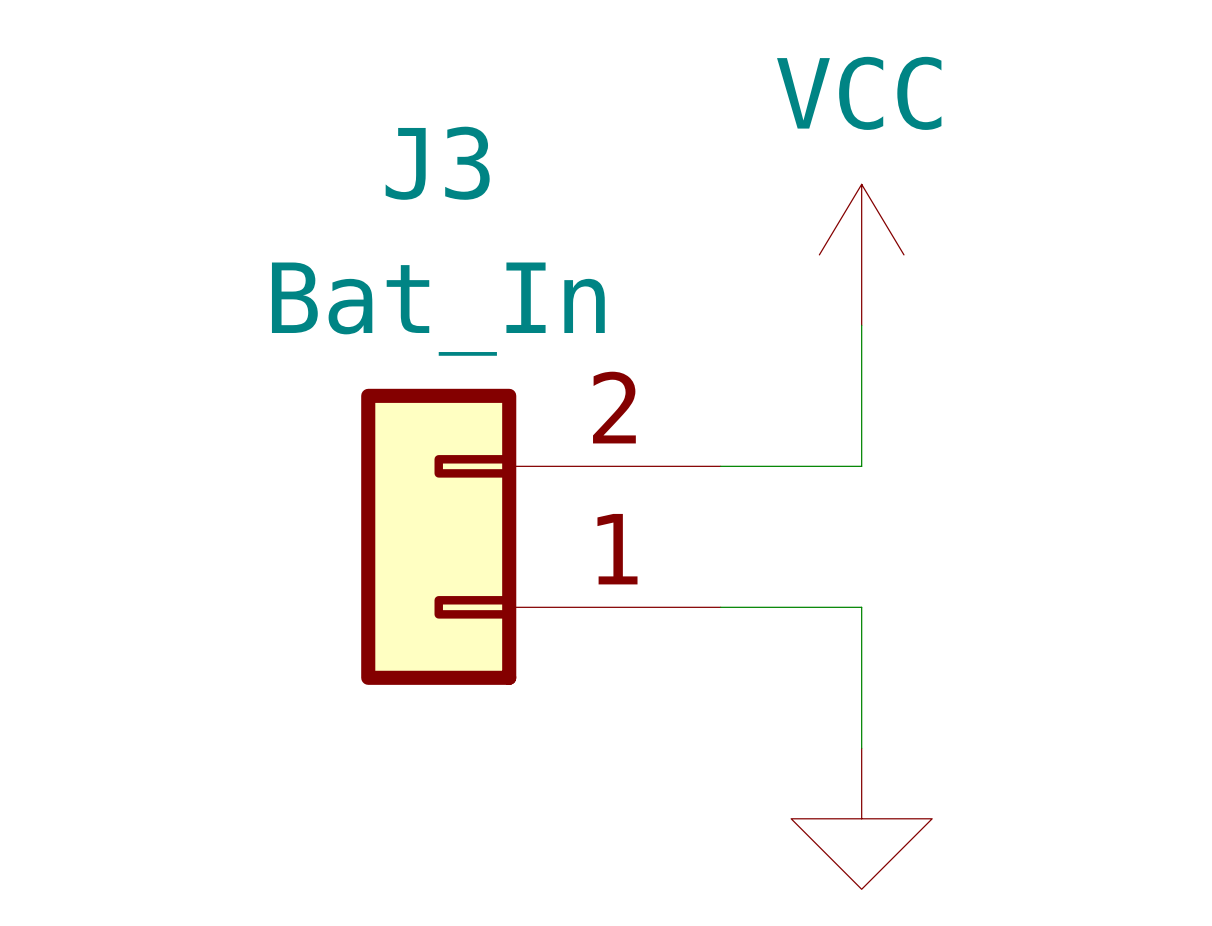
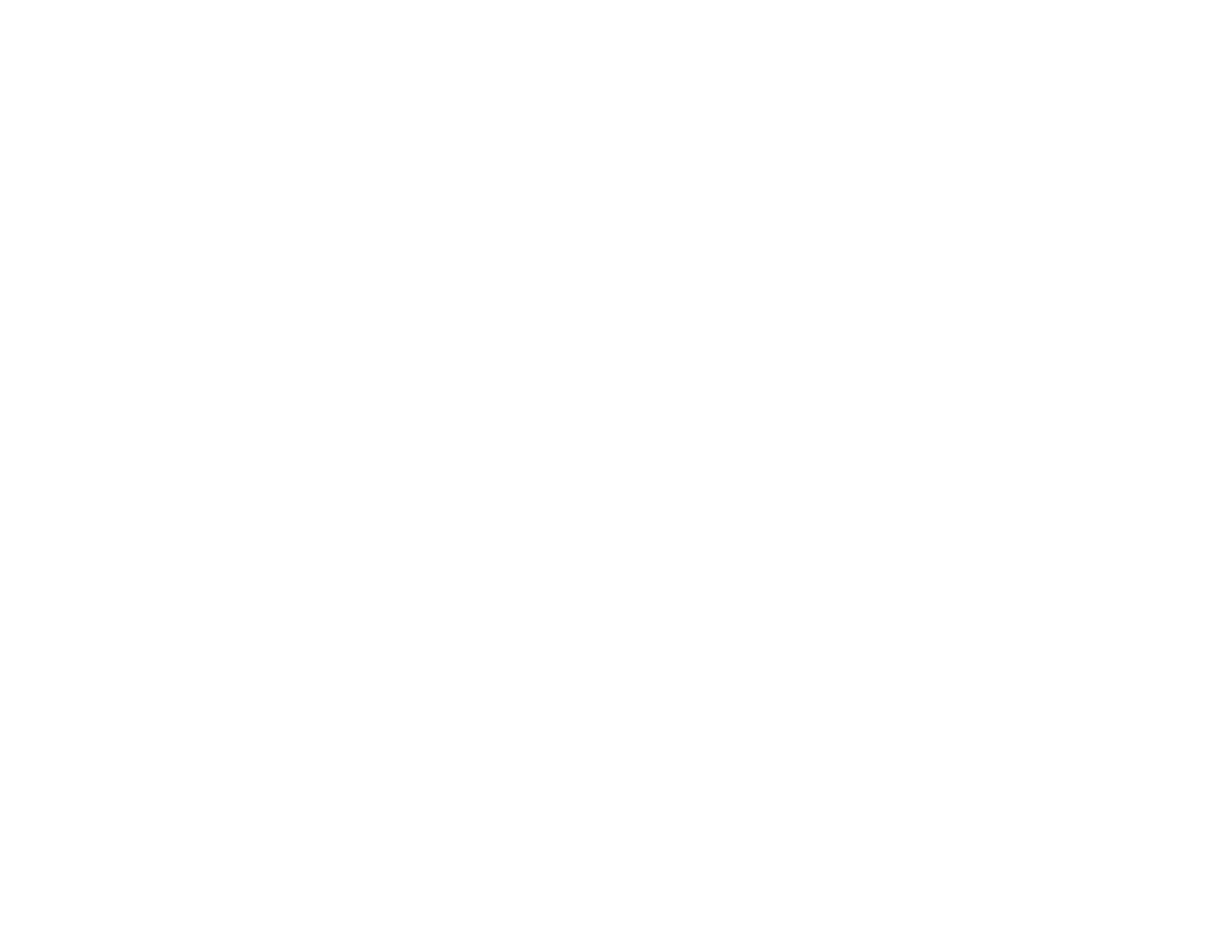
power symbol: VCC (861, 254) -> none
wire: (861, 325) (861, 466) (720, 466) -> none
J3: Bat_In (540, 536) -> none
wire: (720, 607) (861, 607) (861, 748) -> none
power symbol: (861, 818) -> none

